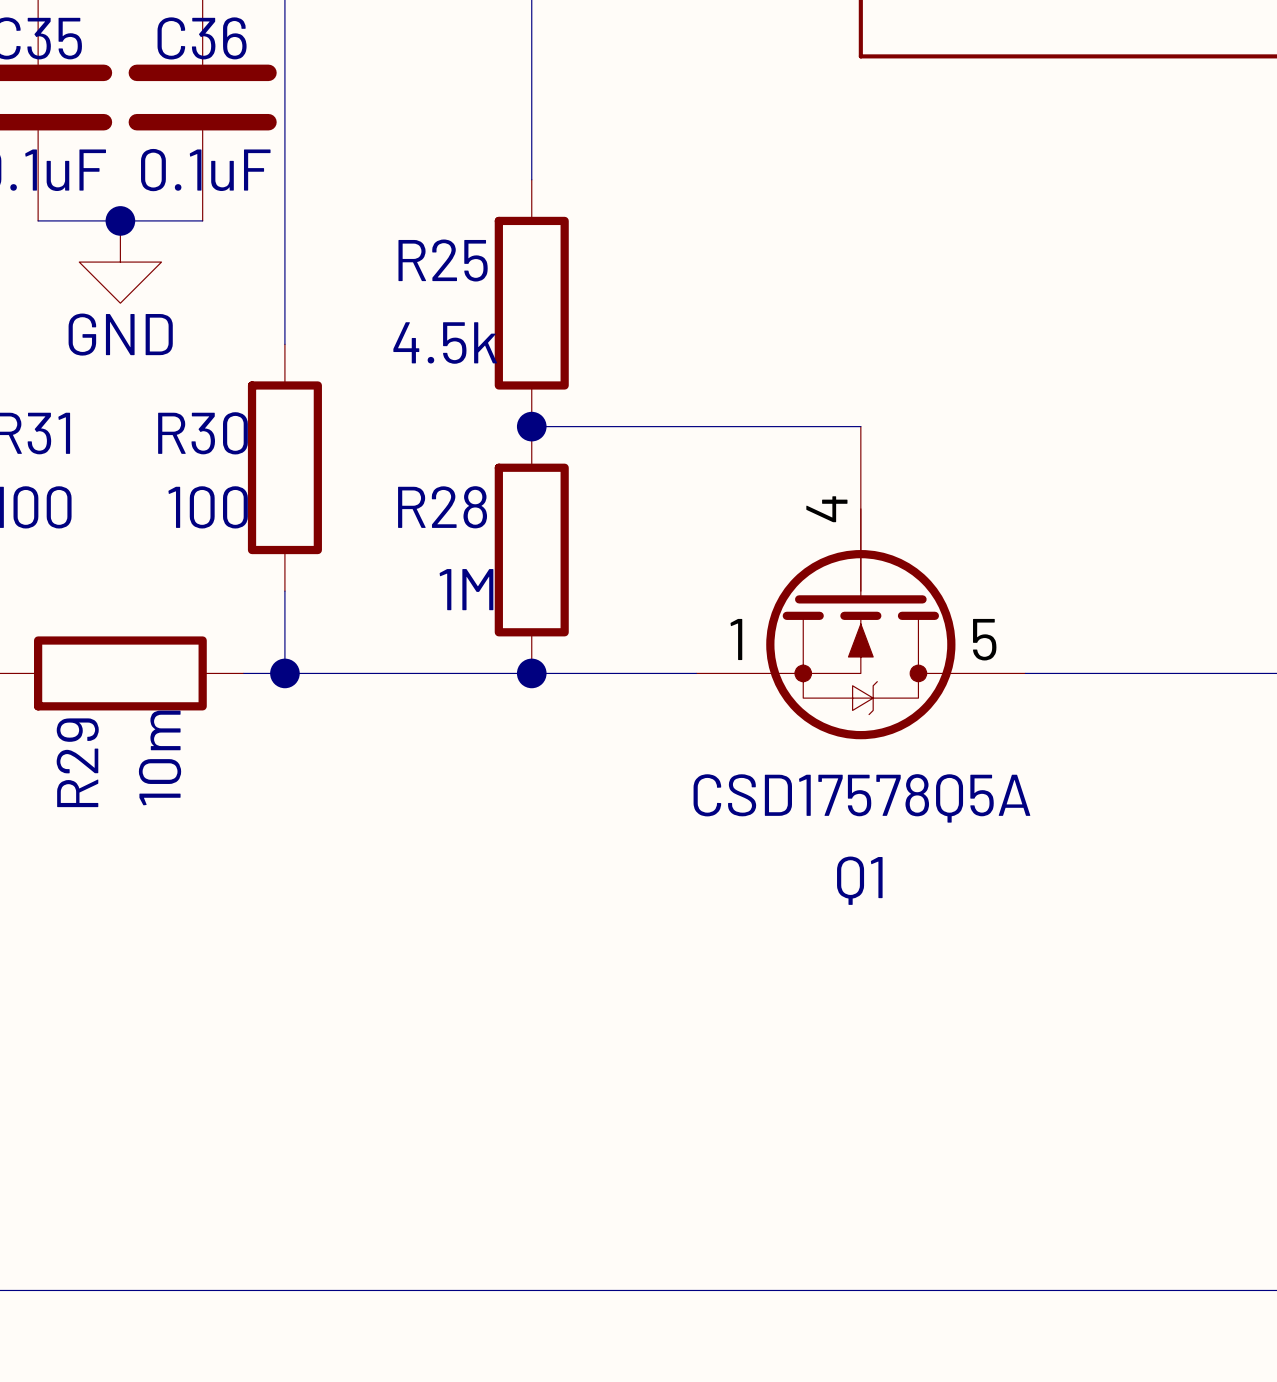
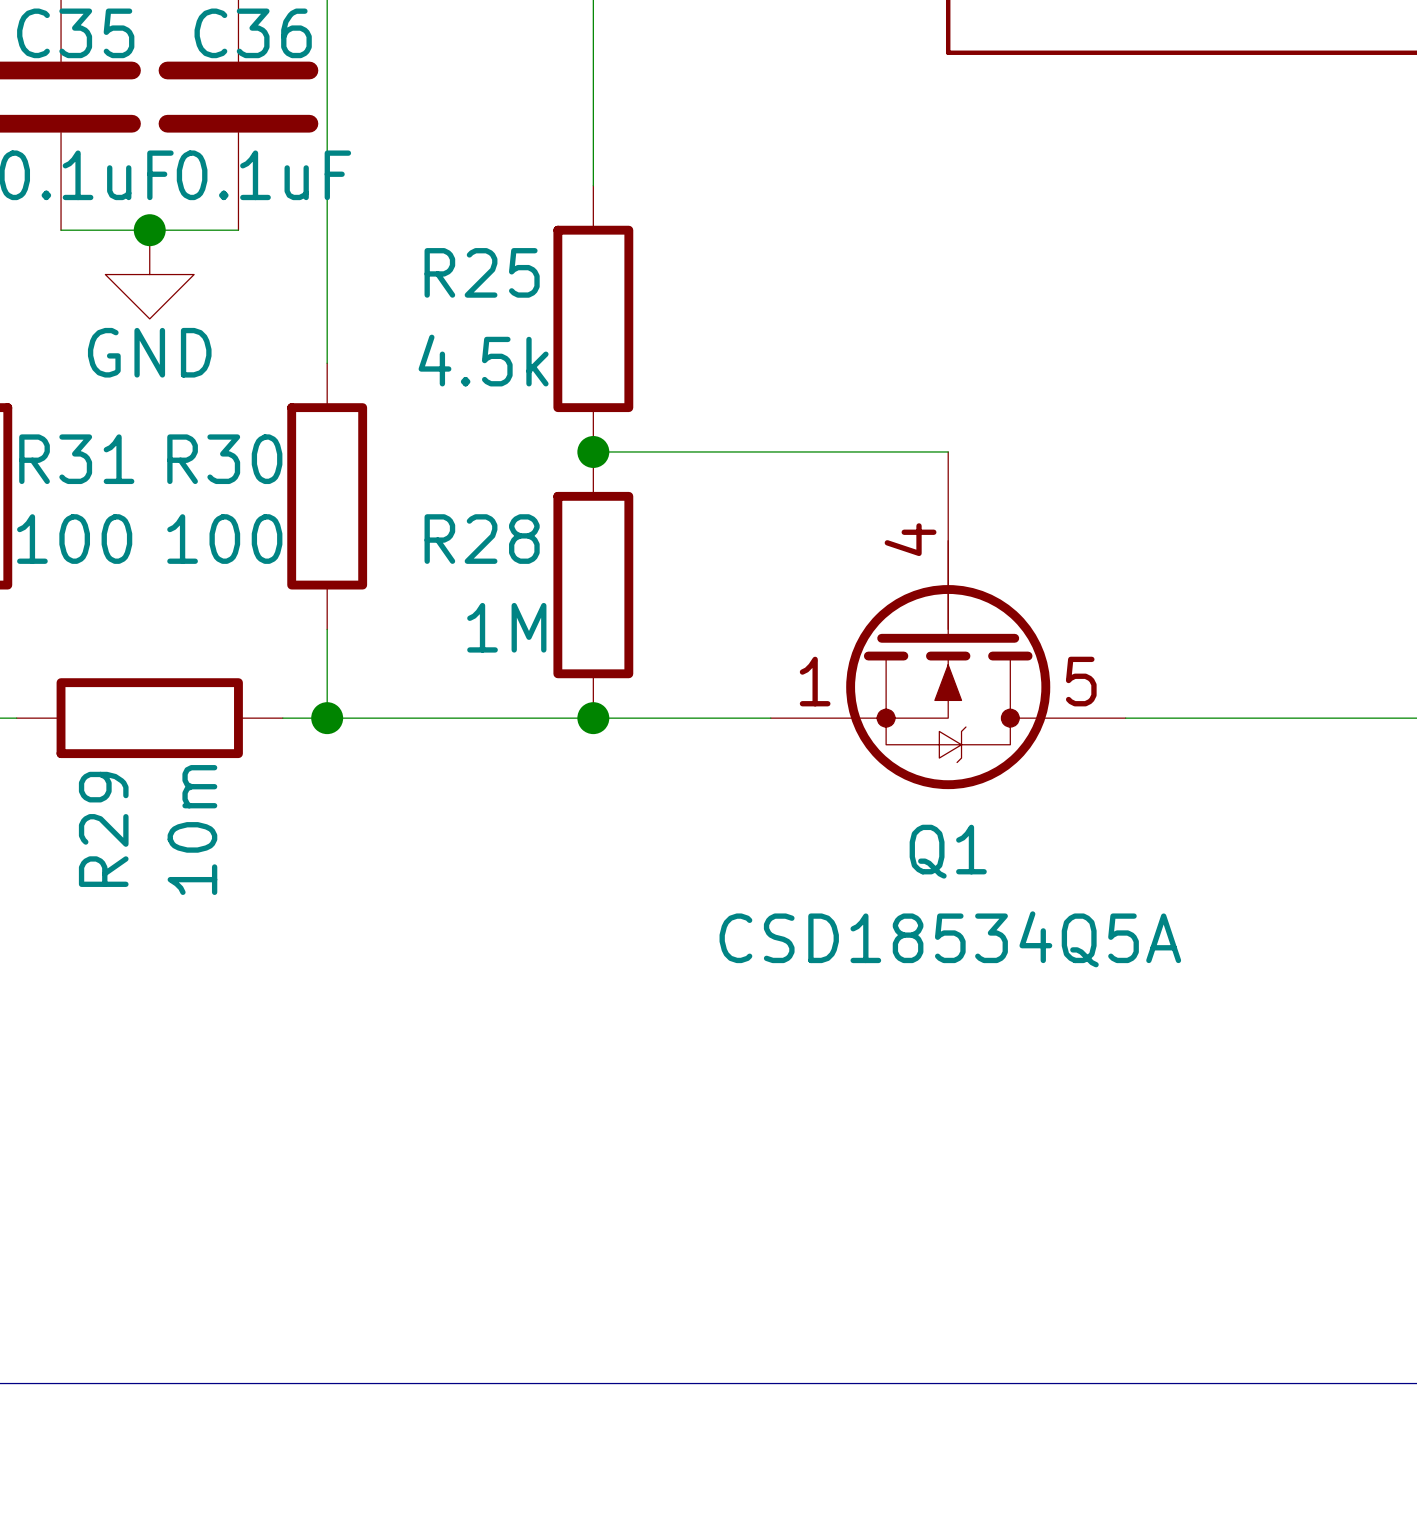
Q1 value: CSD17578Q5A (861, 798) -> CSD18534Q5A (950, 939)
Q1 name position: Q1 (859, 880) -> Q1 (948, 851)

